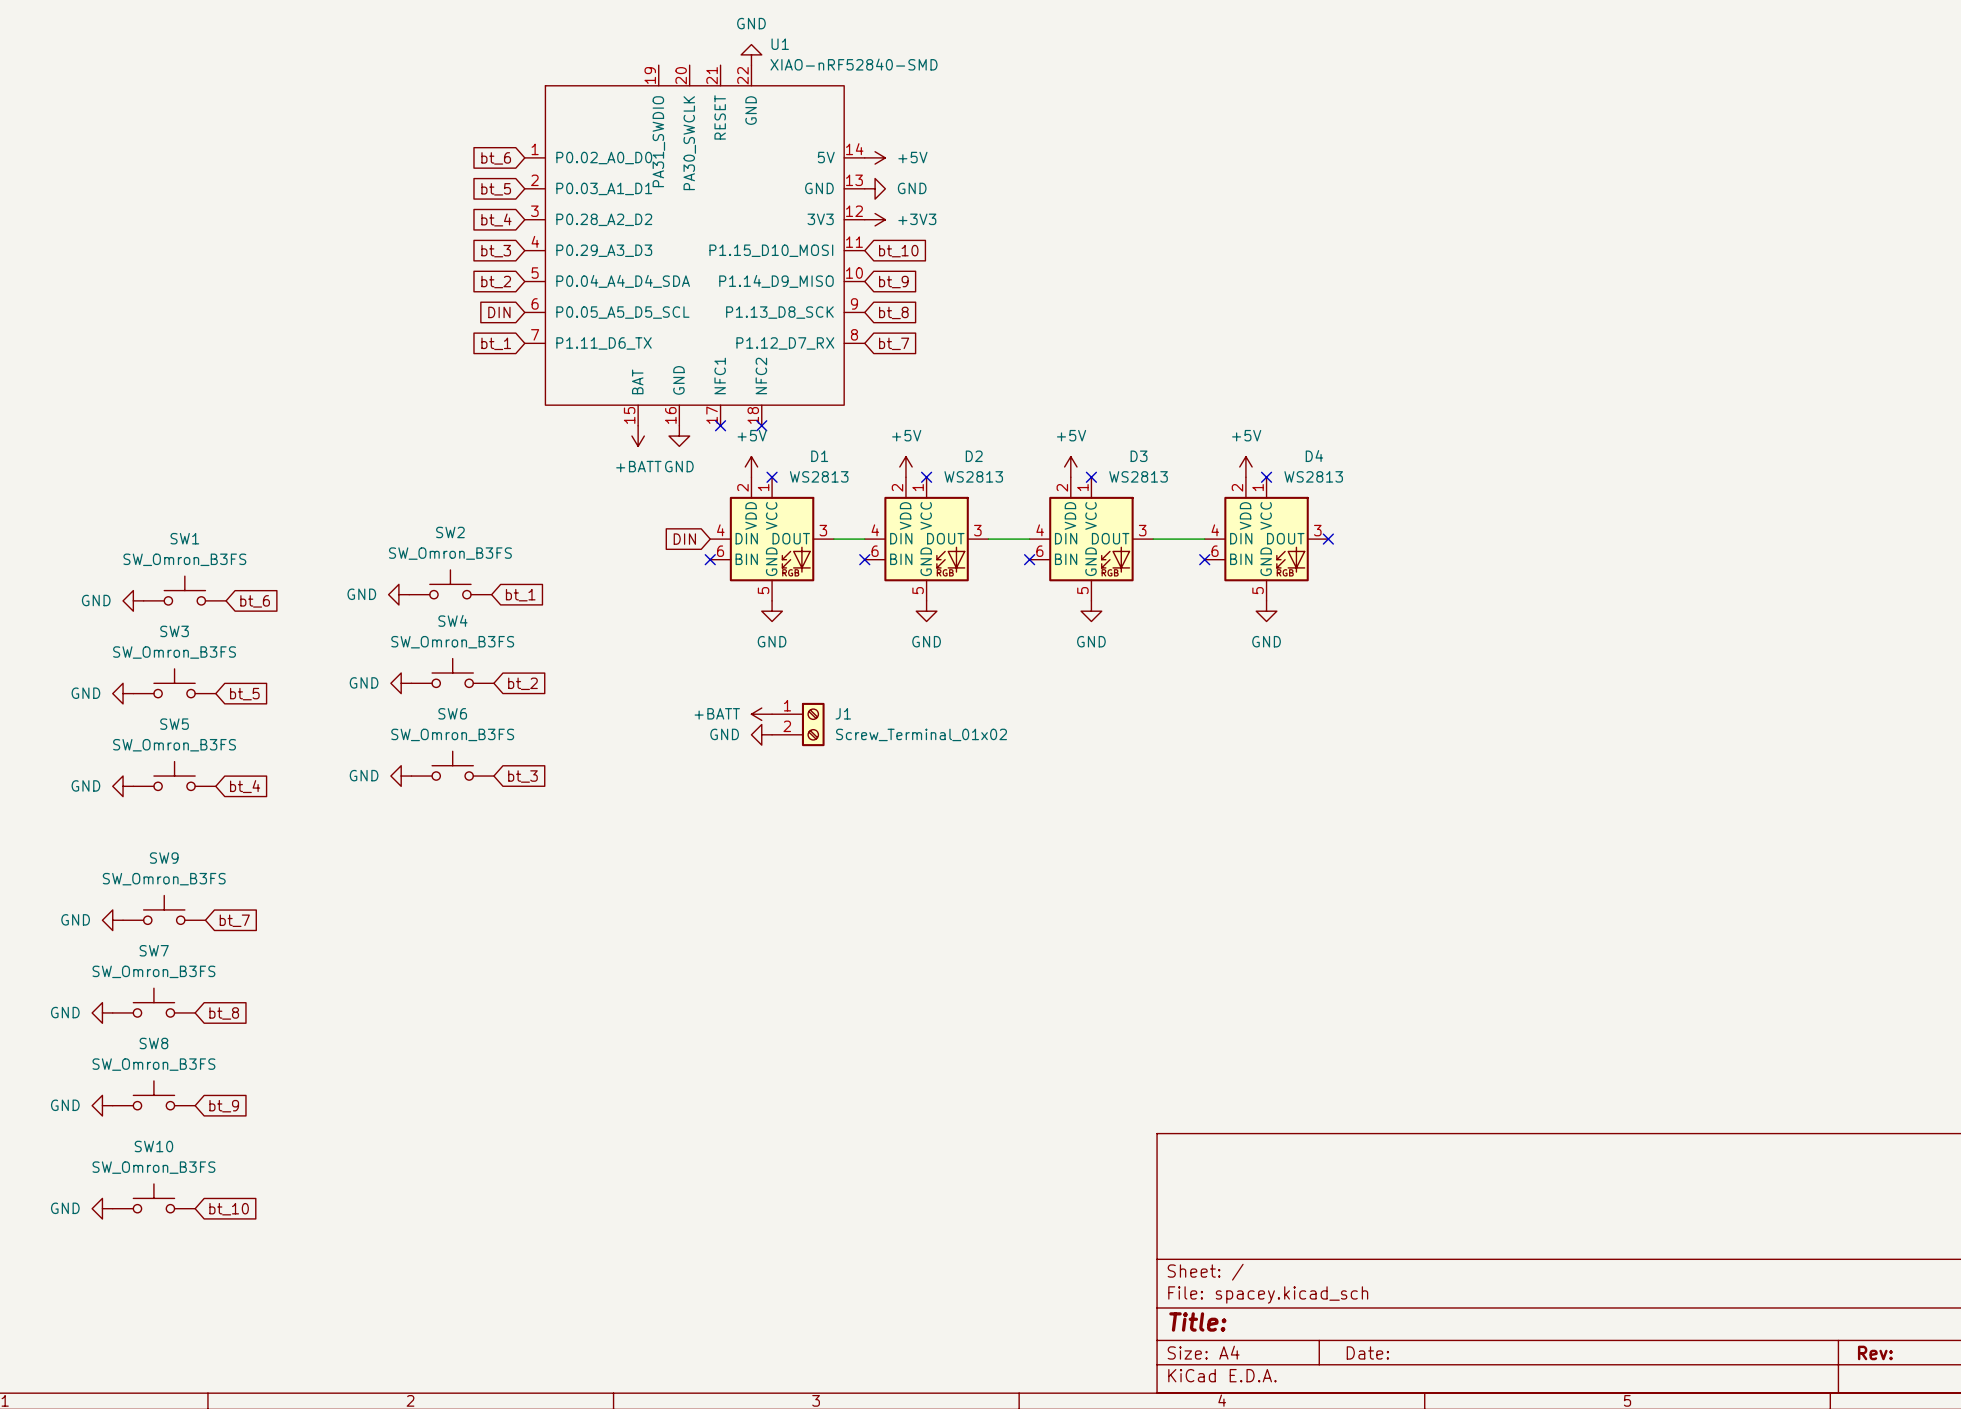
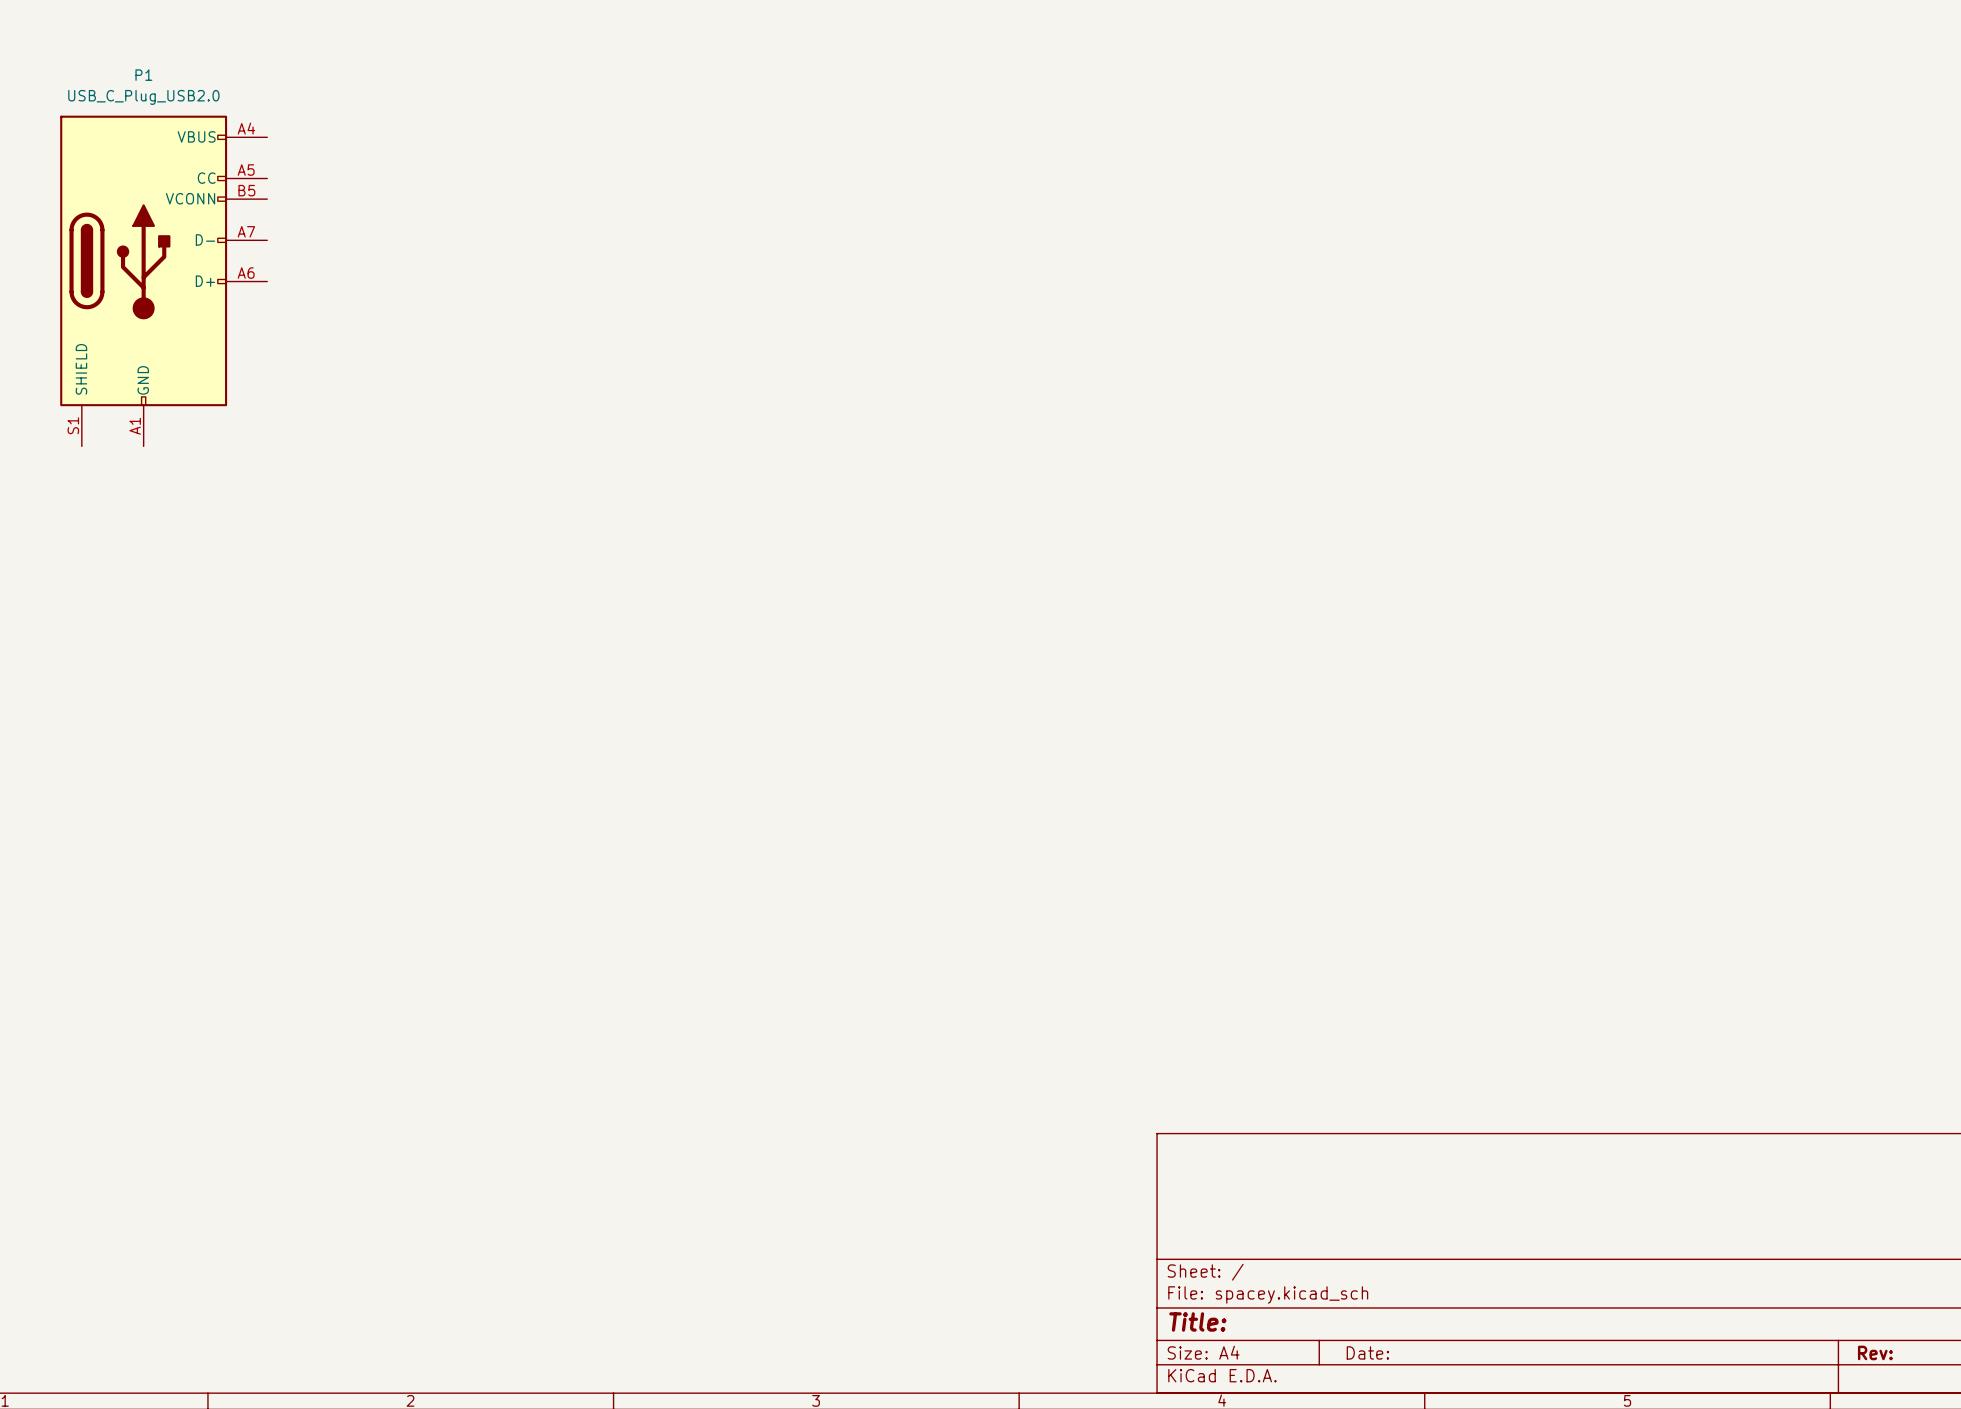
power symbol: GND (751, 54) -> none
power symbol: +5V (875, 157) -> none
global label: bt_6 (496, 158) -> none
power symbol: GND (875, 188) -> none
global label: bt_5 (496, 189) -> none
global label: bt_4 (496, 219) -> none
power symbol: +3V3 (875, 219) -> none
U1: XIAO-nRF52840-SMD (694, 245) -> none
global label: bt_3 (496, 251) -> none
global label: bt_10 (898, 251) -> none
P1: none -> USB_C_Plug_USB2.0 (163, 281)
global label: bt_2 (496, 282) -> none
global label: bt_9 (893, 282) -> none
global label: DIN (499, 312) -> none
global label: bt_8 (893, 312) -> none
global label: bt_1 (496, 343) -> none
global label: bt_7 (894, 343) -> none
no-connect mark: (720, 425) -> none
no-connect mark: (761, 425) -> none
power symbol: +BATT (638, 436) -> none
power symbol: GND (679, 436) -> none
power symbol: +5V (751, 466) -> none
power symbol: +5V (905, 466) -> none
power symbol: +5V (1070, 466) -> none
power symbol: +5V (1245, 466) -> none
no-connect mark: (772, 477) -> none
no-connect mark: (926, 477) -> none
no-connect mark: (1091, 477) -> none
no-connect mark: (1266, 477) -> none
global label: DIN (684, 539) -> none
D1: WS2813 (772, 539) -> none
wire: (833, 539) (864, 539) -> none
D2: WS2813 (926, 539) -> none
wire: (988, 539) (1029, 539) -> none
D3: WS2813 (1091, 539) -> none
wire: (1153, 539) (1204, 539) -> none
D4: WS2813 (1266, 539) -> none
no-connect mark: (1328, 539) -> none
no-connect mark: (710, 559) -> none
no-connect mark: (864, 559) -> none
no-connect mark: (1029, 559) -> none
no-connect mark: (1204, 559) -> none
SW2: SW_Omron_B3FS (450, 584) -> none
SW1: SW_Omron_B3FS (184, 590) -> none
power symbol: GND (398, 594) -> none
global label: bt_1 (520, 595) -> none
power symbol: GND (133, 600) -> none
global label: bt_6 (255, 601) -> none
power symbol: GND (772, 611) -> none
power symbol: GND (926, 611) -> none
power symbol: GND (1091, 611) -> none
power symbol: GND (1266, 611) -> none
SW4: SW_Omron_B3FS (452, 673) -> none
SW3: SW_Omron_B3FS (174, 683) -> none
power symbol: GND (401, 683) -> none
global label: bt_2 (522, 683) -> none
power symbol: GND (123, 693) -> none
global label: bt_5 (244, 694) -> none
power symbol: +BATT (761, 714) -> none
J1: Screw_Terminal_01x02 (798, 724) -> none
power symbol: GND (761, 734) -> none
SW6: SW_Omron_B3FS (452, 765) -> none
SW5: SW_Omron_B3FS (174, 776) -> none
power symbol: GND (401, 776) -> none
global label: bt_3 (522, 776) -> none
power symbol: GND (123, 786) -> none
global label: bt_4 (245, 786) -> none
SW9: SW_Omron_B3FS (164, 909) -> none
power symbol: GND (112, 920) -> none
global label: bt_7 (234, 920) -> none
SW7: SW_Omron_B3FS (153, 1002) -> none
power symbol: GND (102, 1012) -> none
global label: bt_8 (224, 1013) -> none
SW8: SW_Omron_B3FS (153, 1095) -> none
power symbol: GND (102, 1105) -> none
global label: bt_9 (224, 1106) -> none
SW10: SW_Omron_B3FS (153, 1198) -> none
power symbol: GND (102, 1208) -> none
global label: bt_10 (229, 1209) -> none

